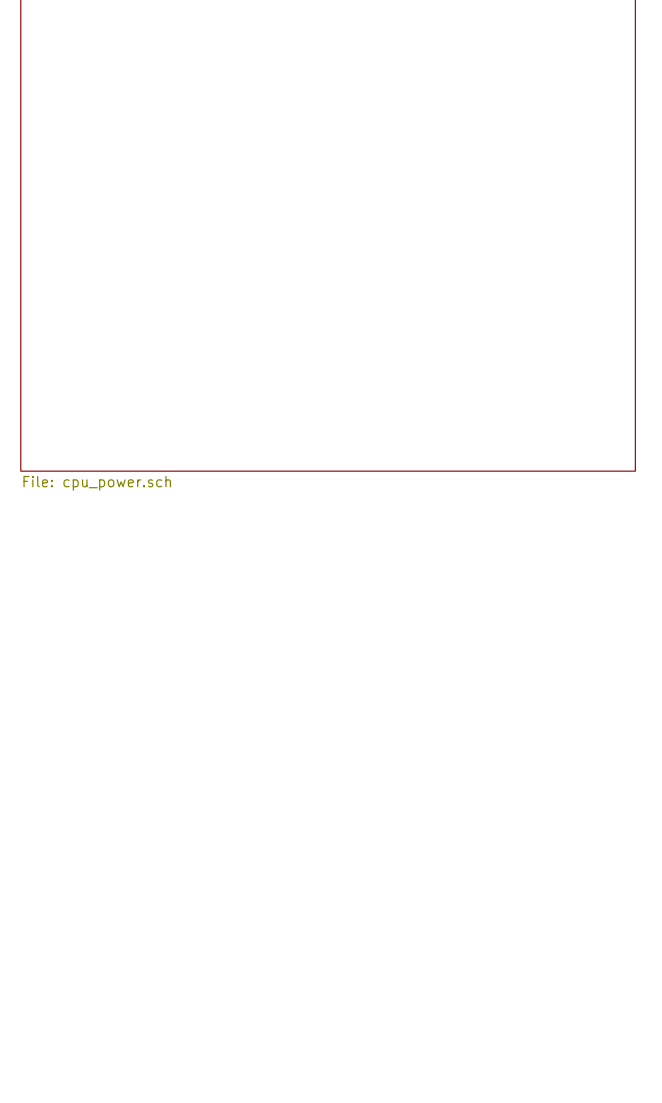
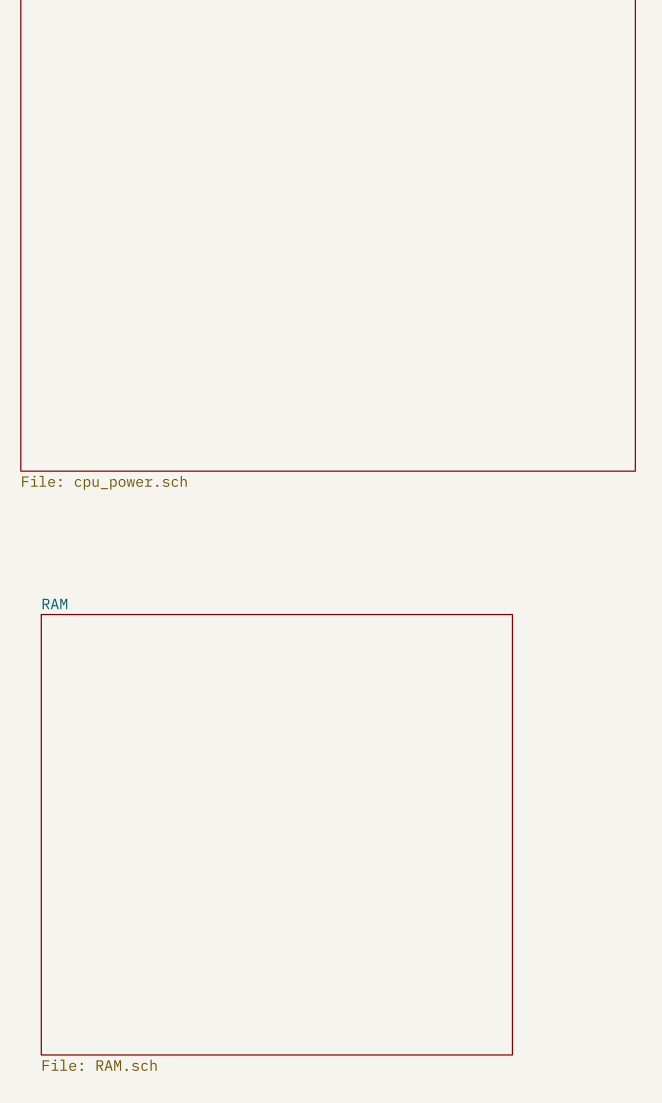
sheet RAM: none -> File: RAM.sch (276, 834)

